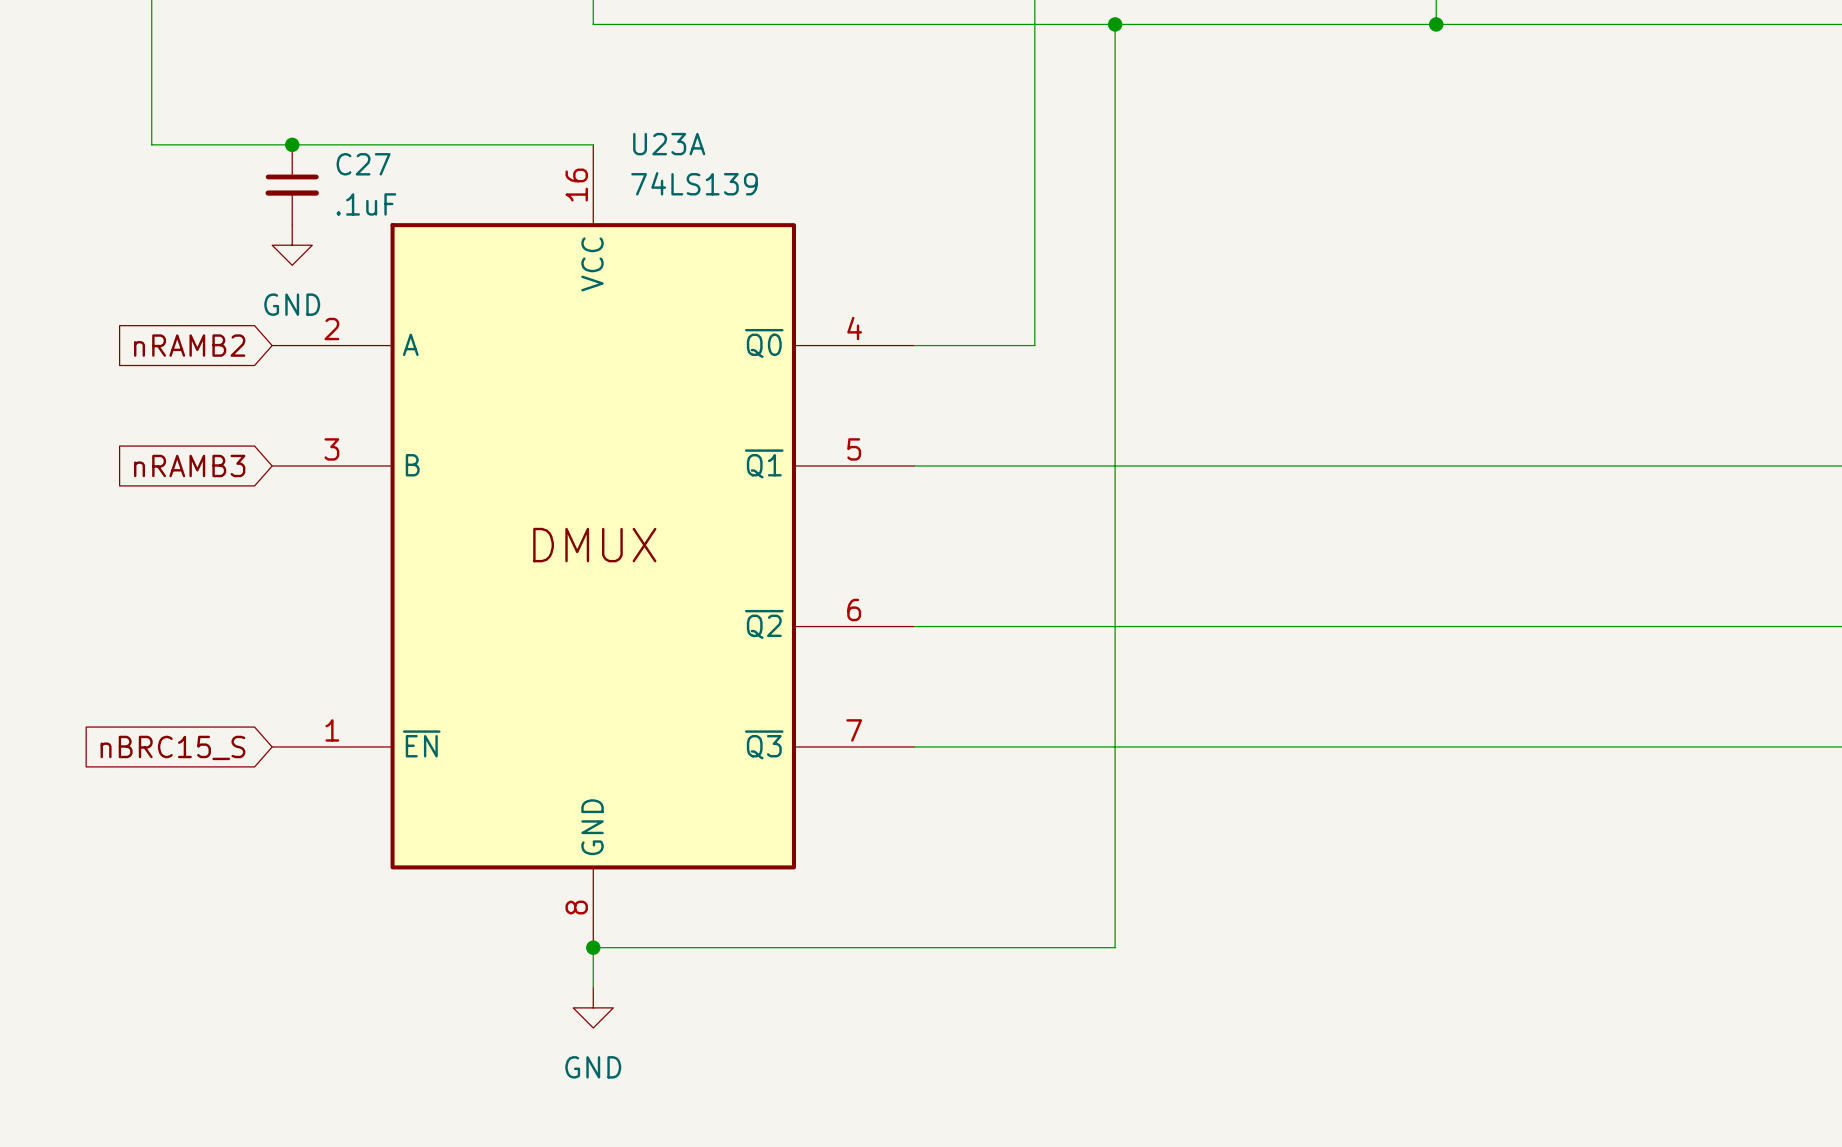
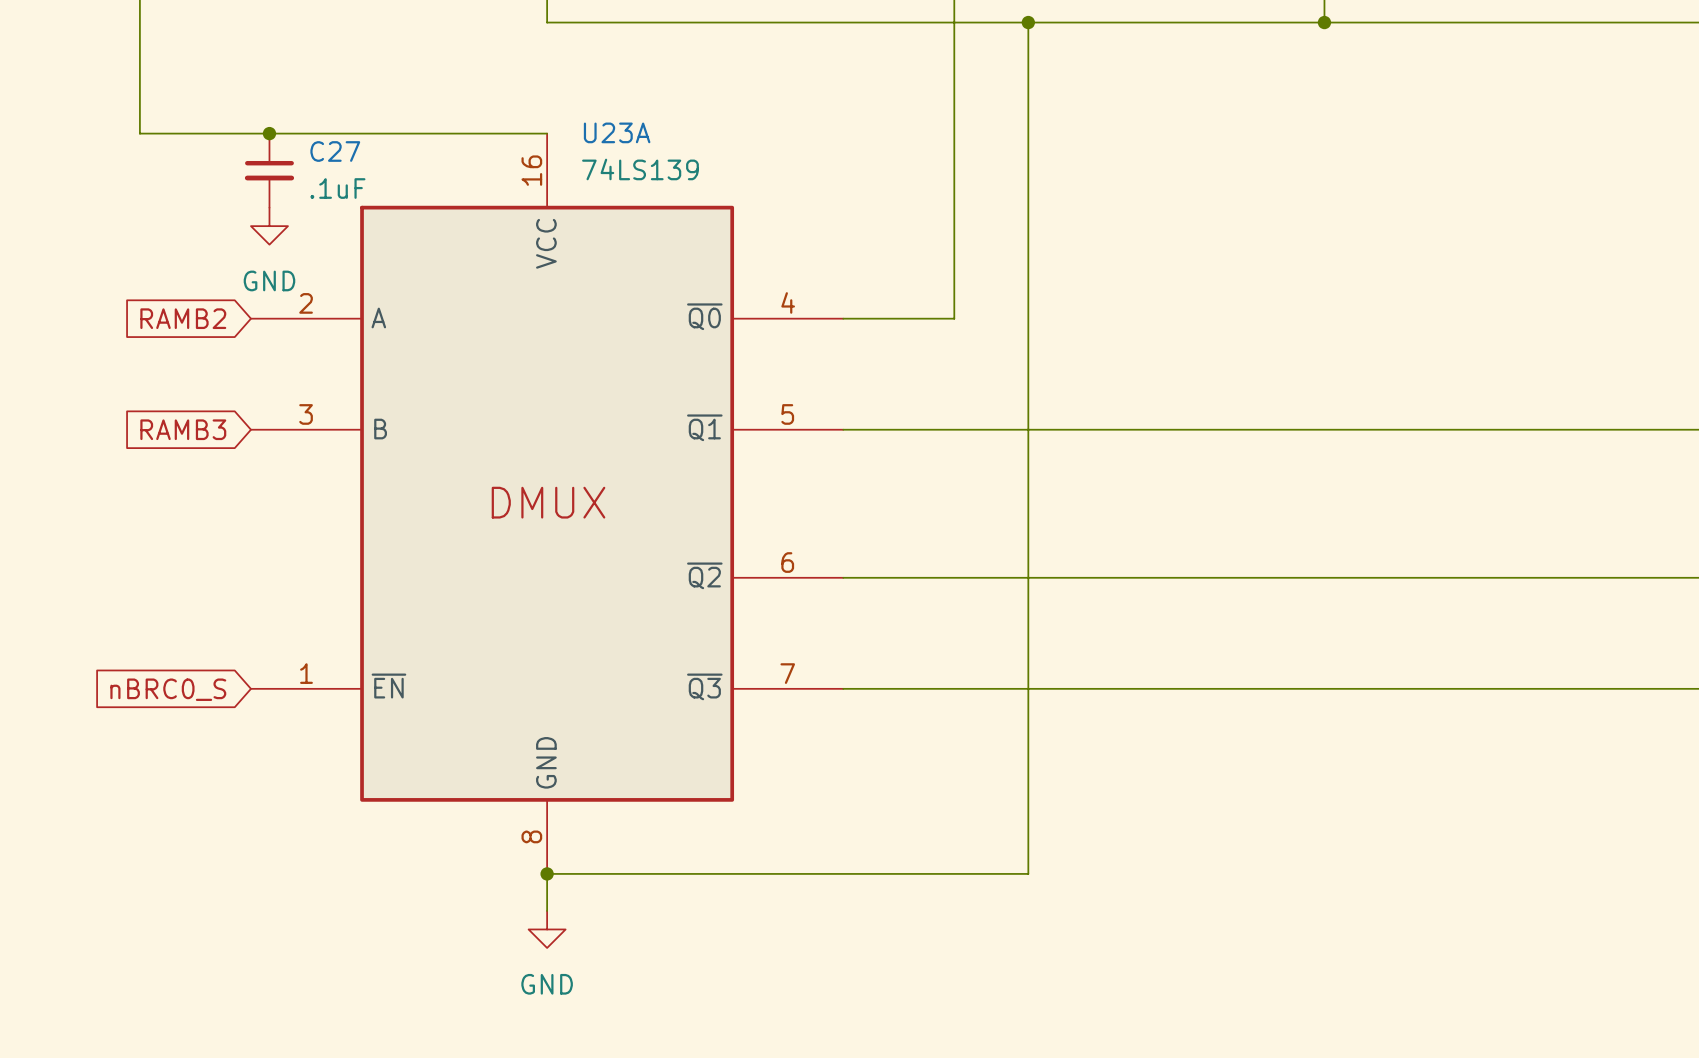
global label: nRAMB2 (189, 345) -> RAMB2 (183, 318)
global label: nRAMB3 (189, 465) -> RAMB3 (183, 429)
global label: nBRC15_S (172, 747) -> nBRC0_S (168, 689)

